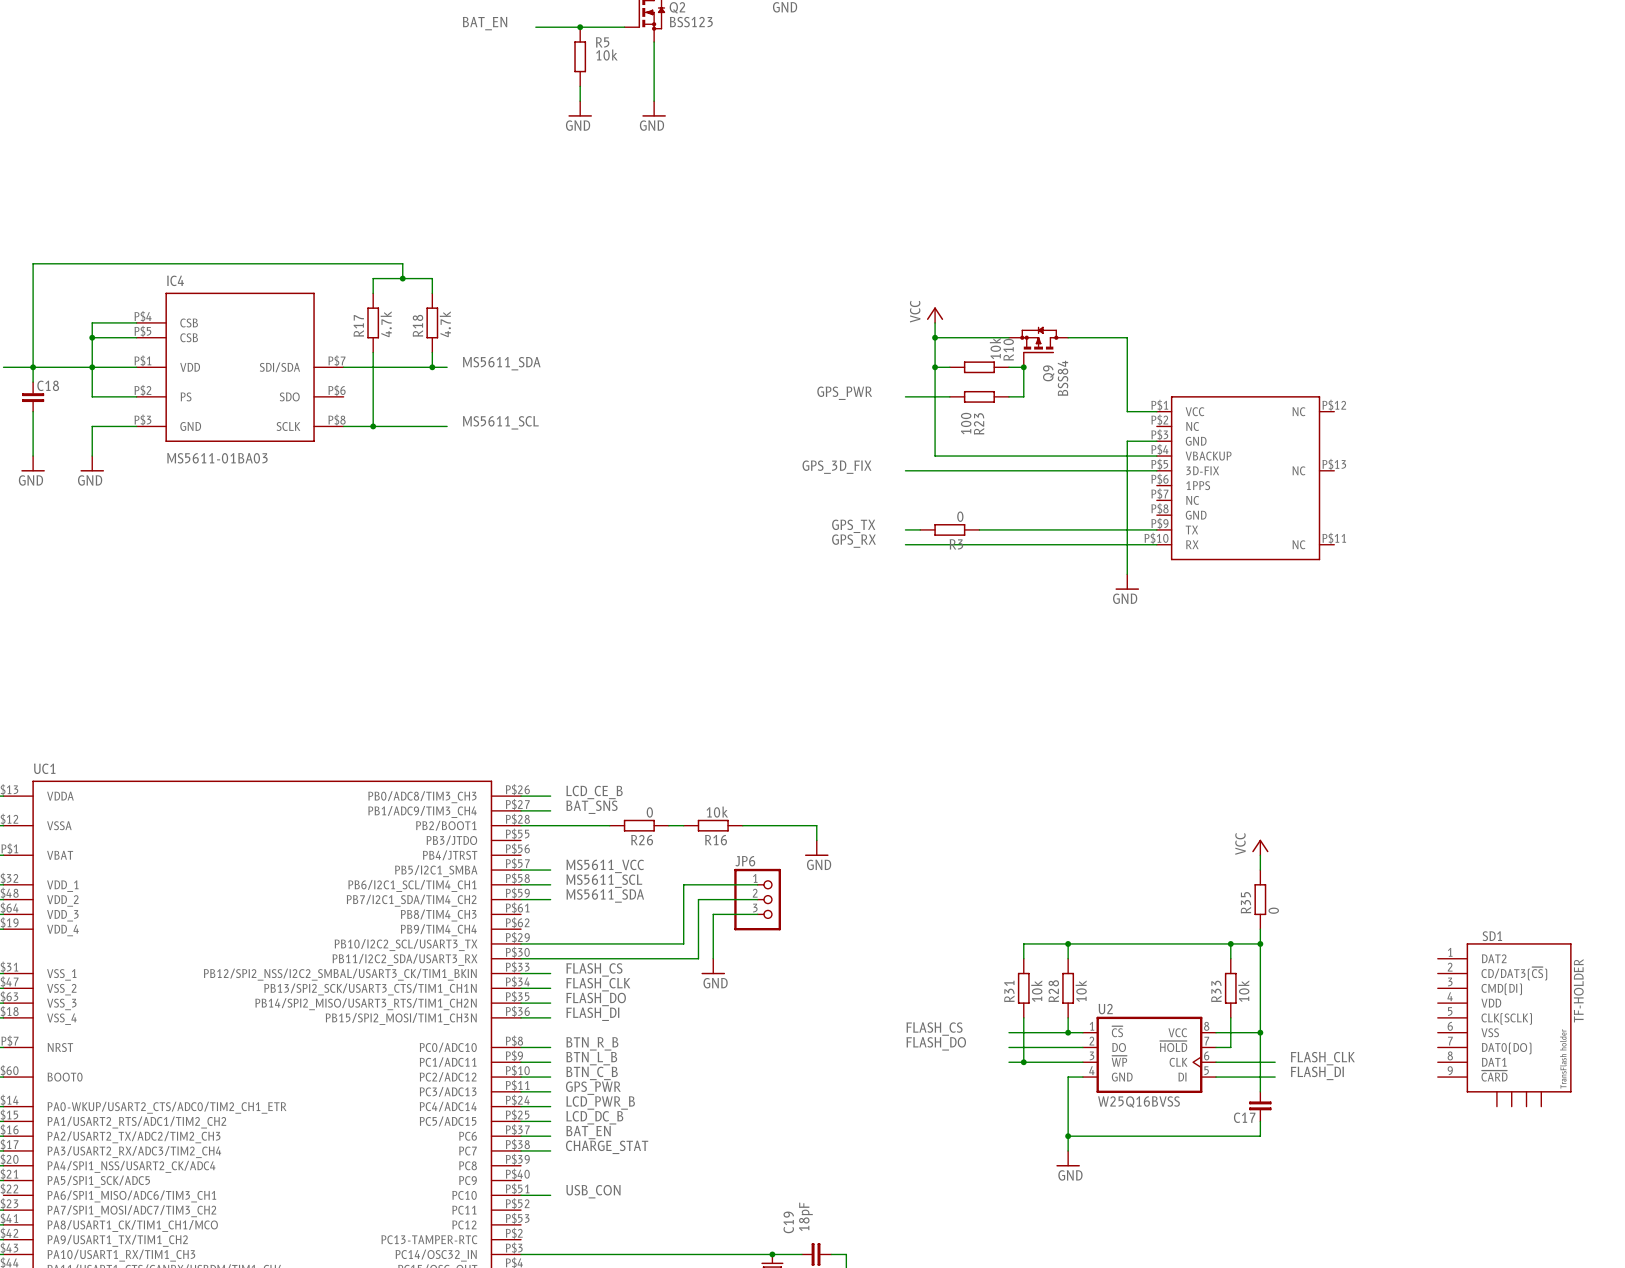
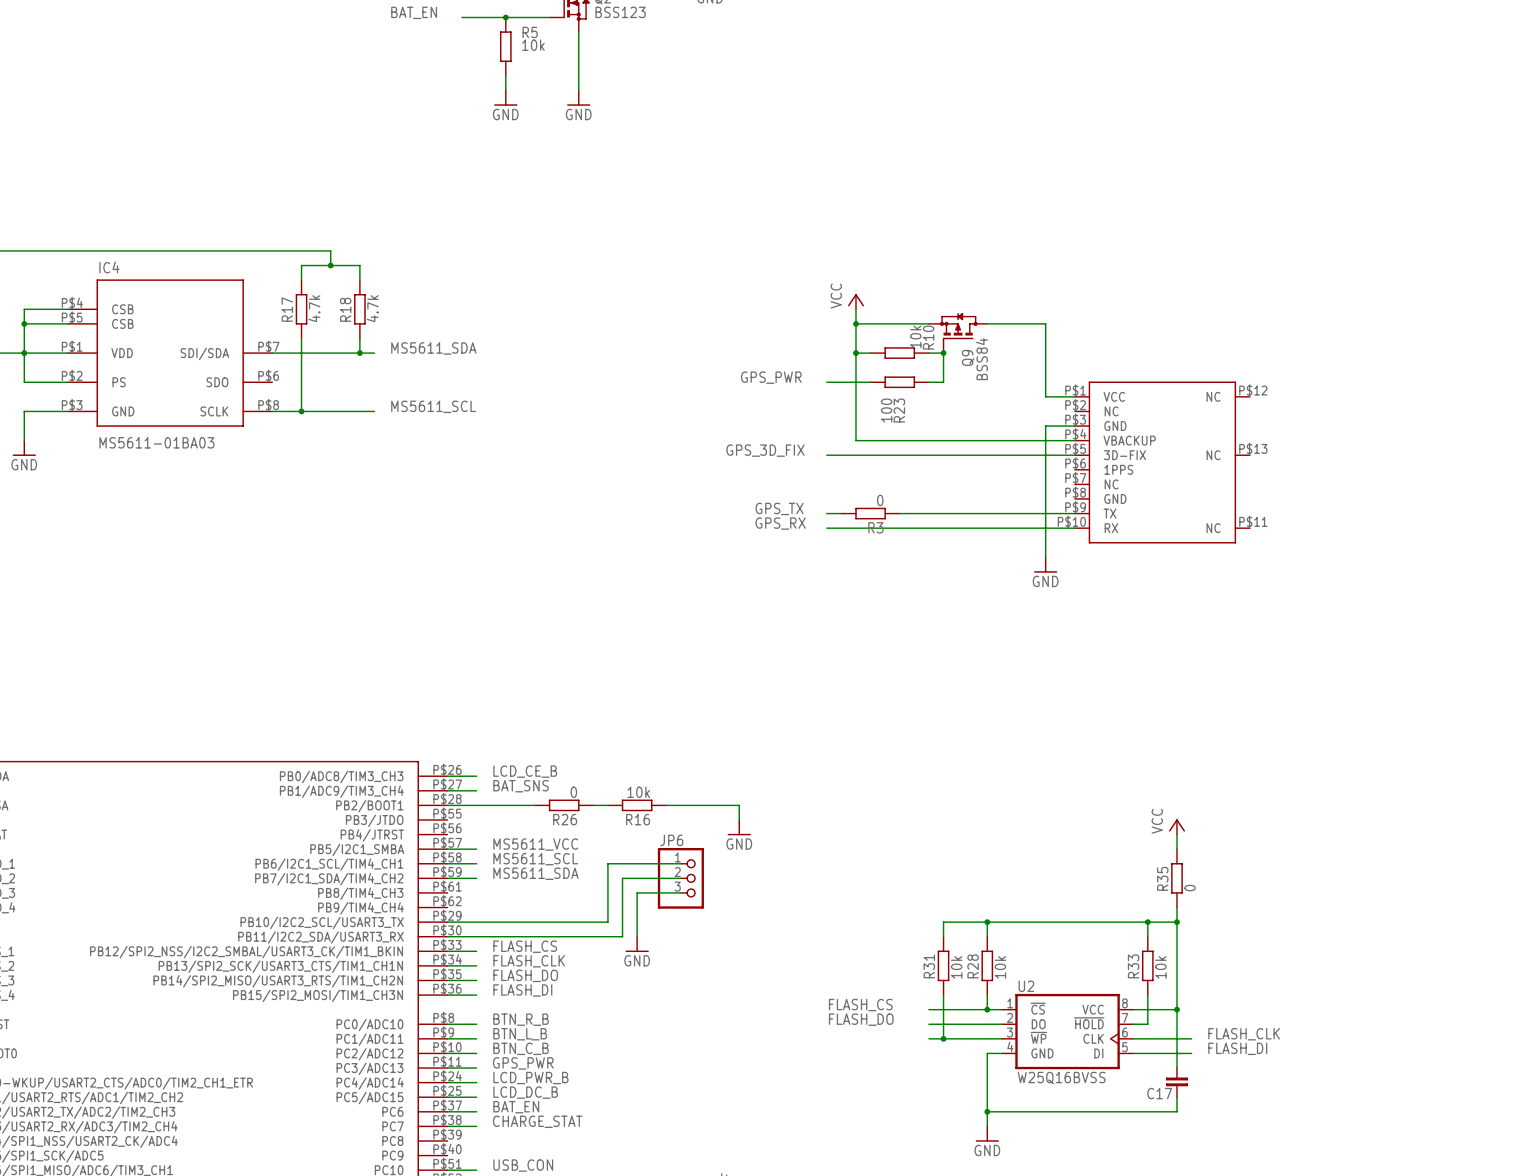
SD1: TF-HOLDER (1504, 1024) -> none

